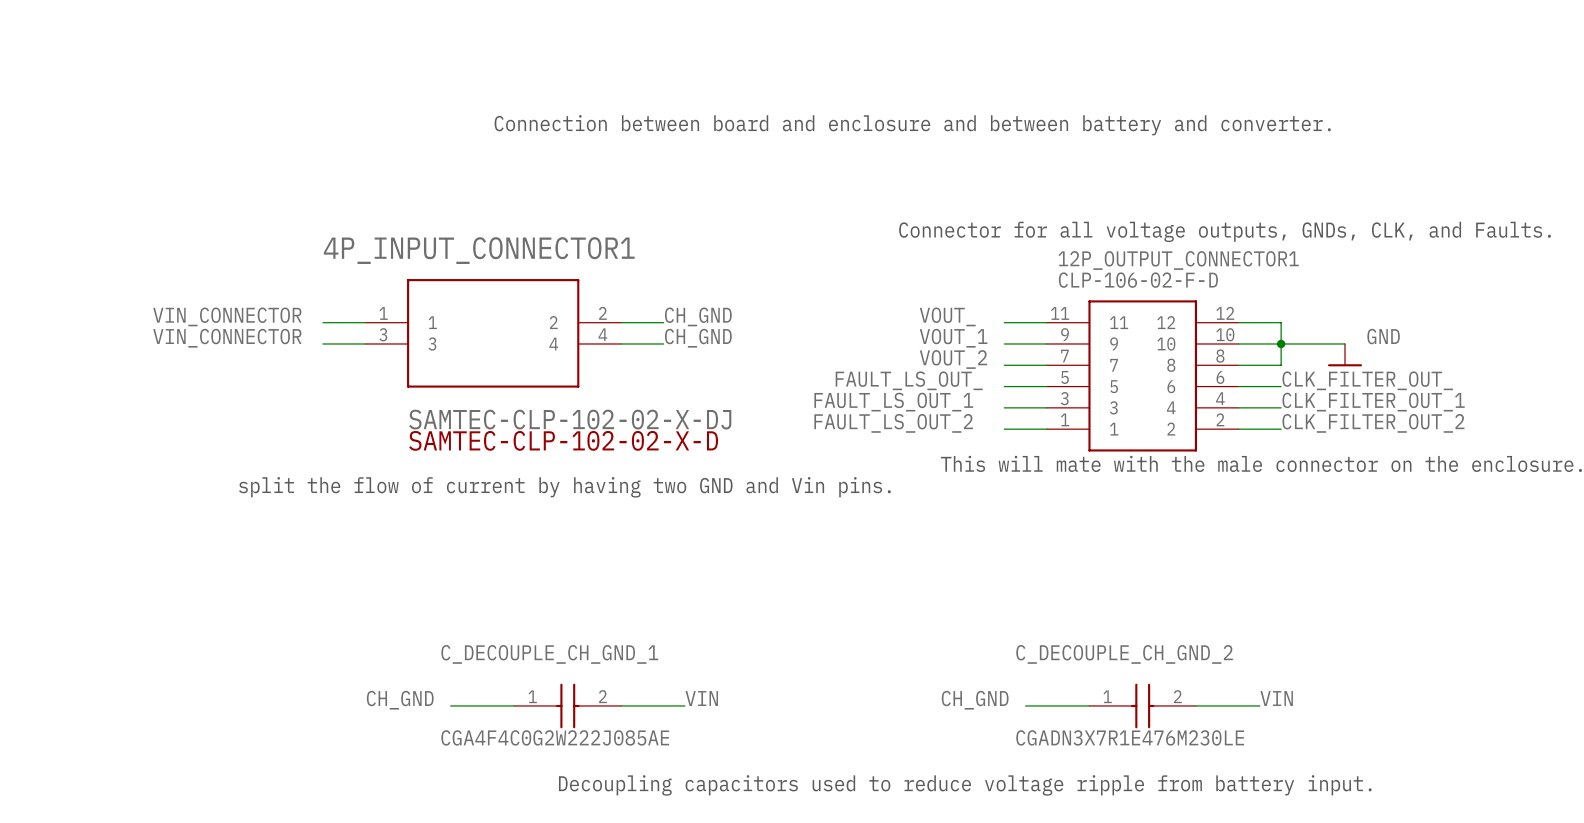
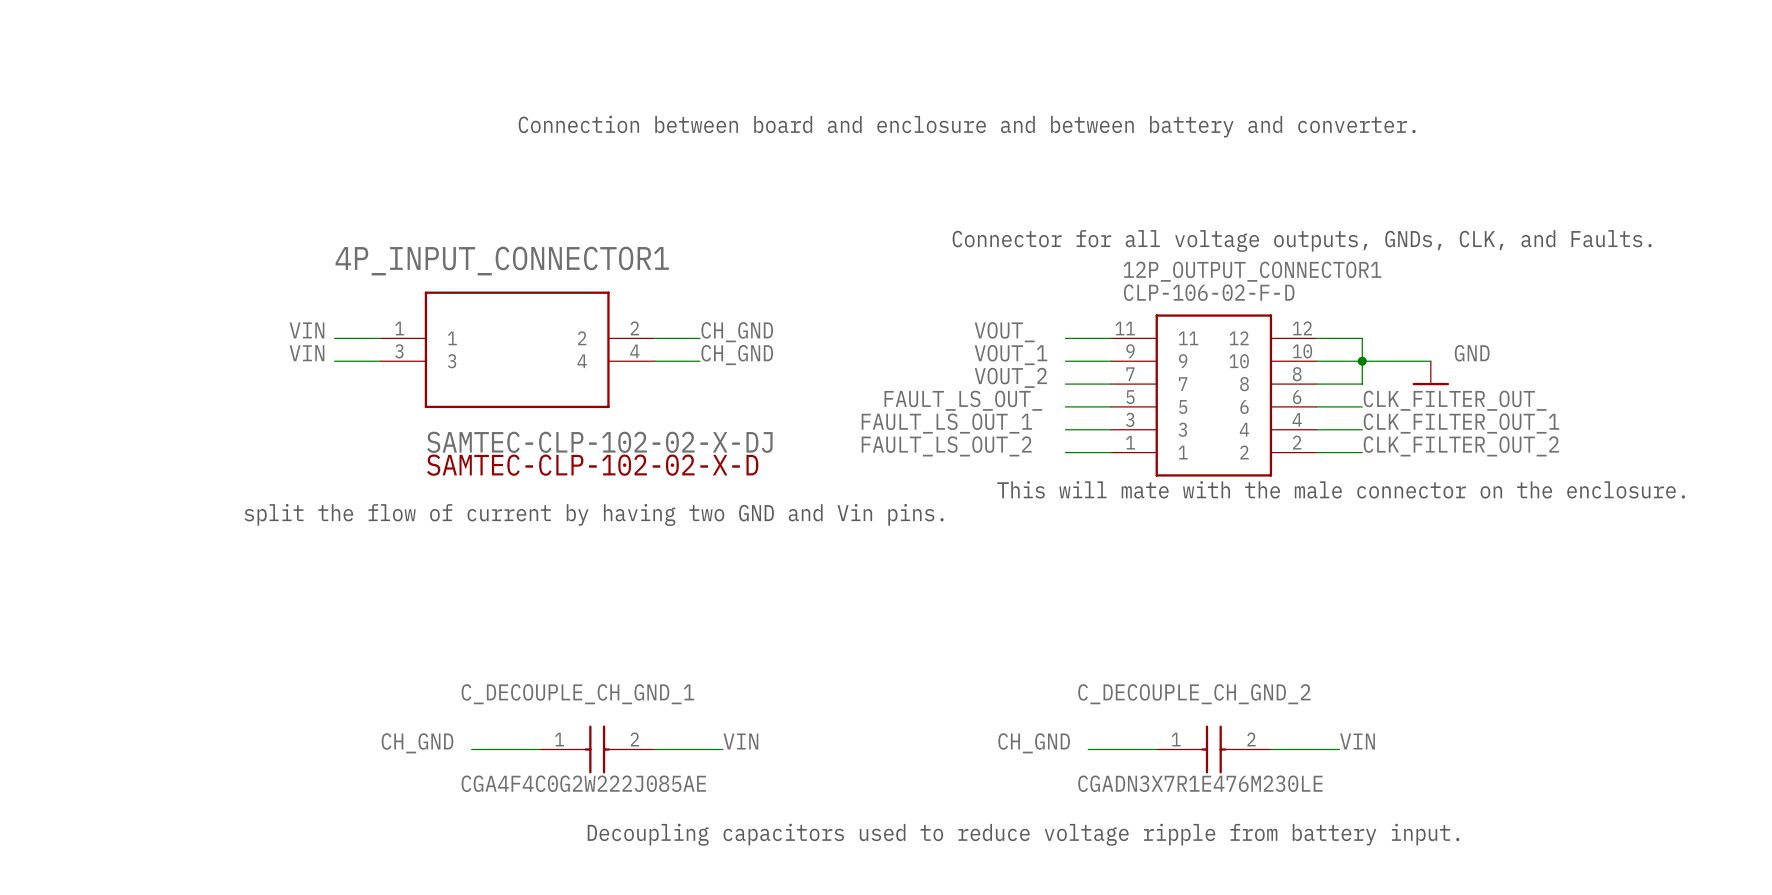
label: none -> VIN (306, 330)
label: VIN_CONNECTOR (227, 316) -> none
label: none -> VIN (306, 353)
label: VIN_CONNECTOR (227, 338) -> none

